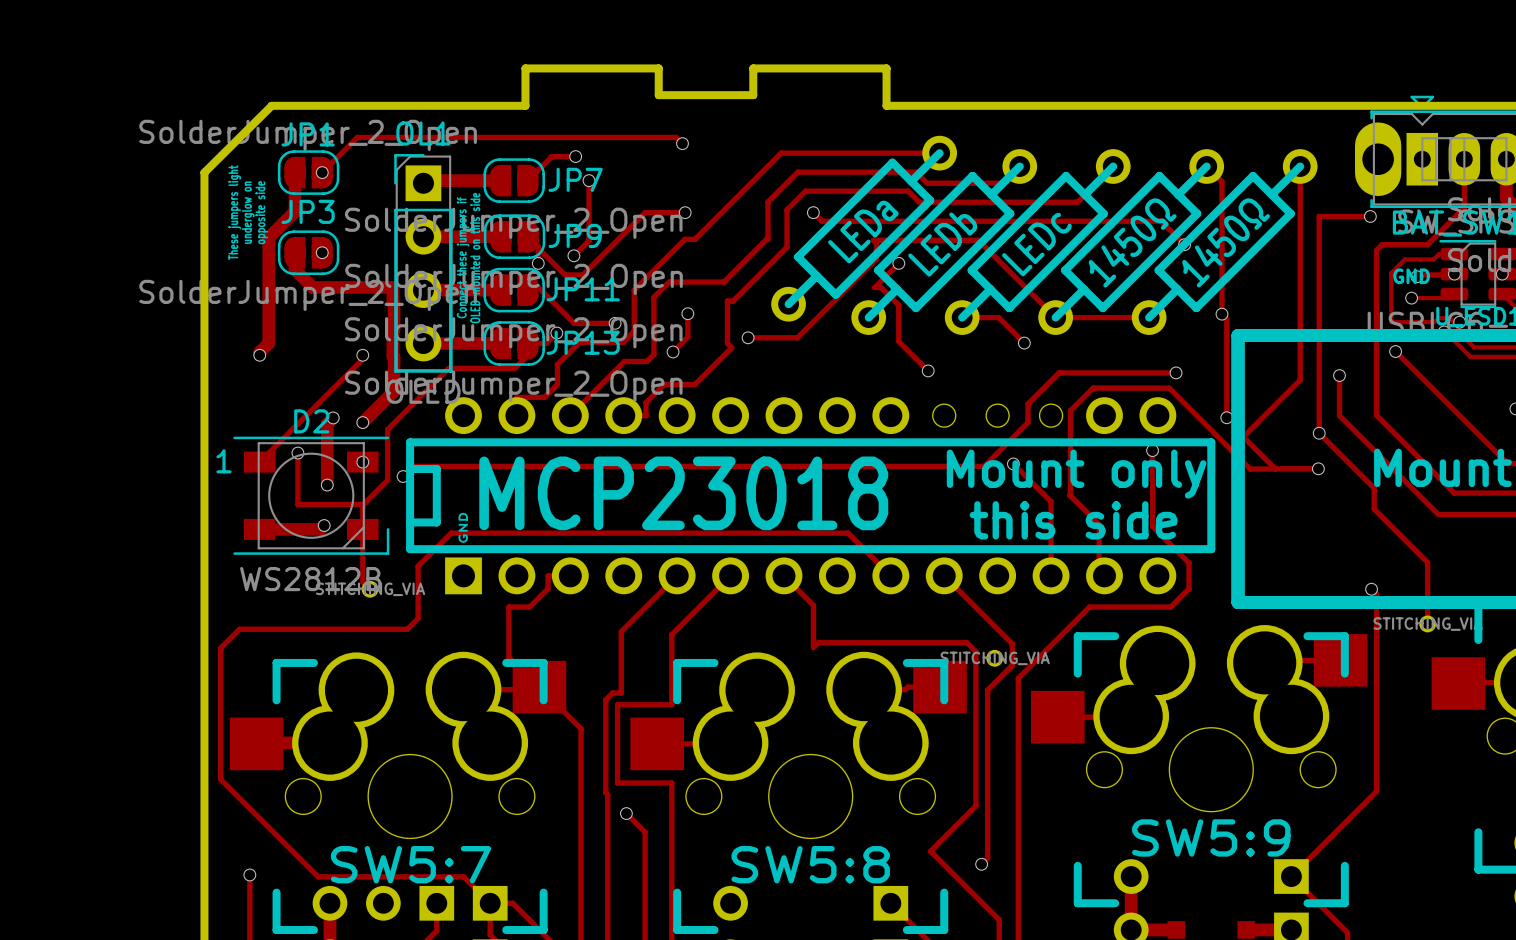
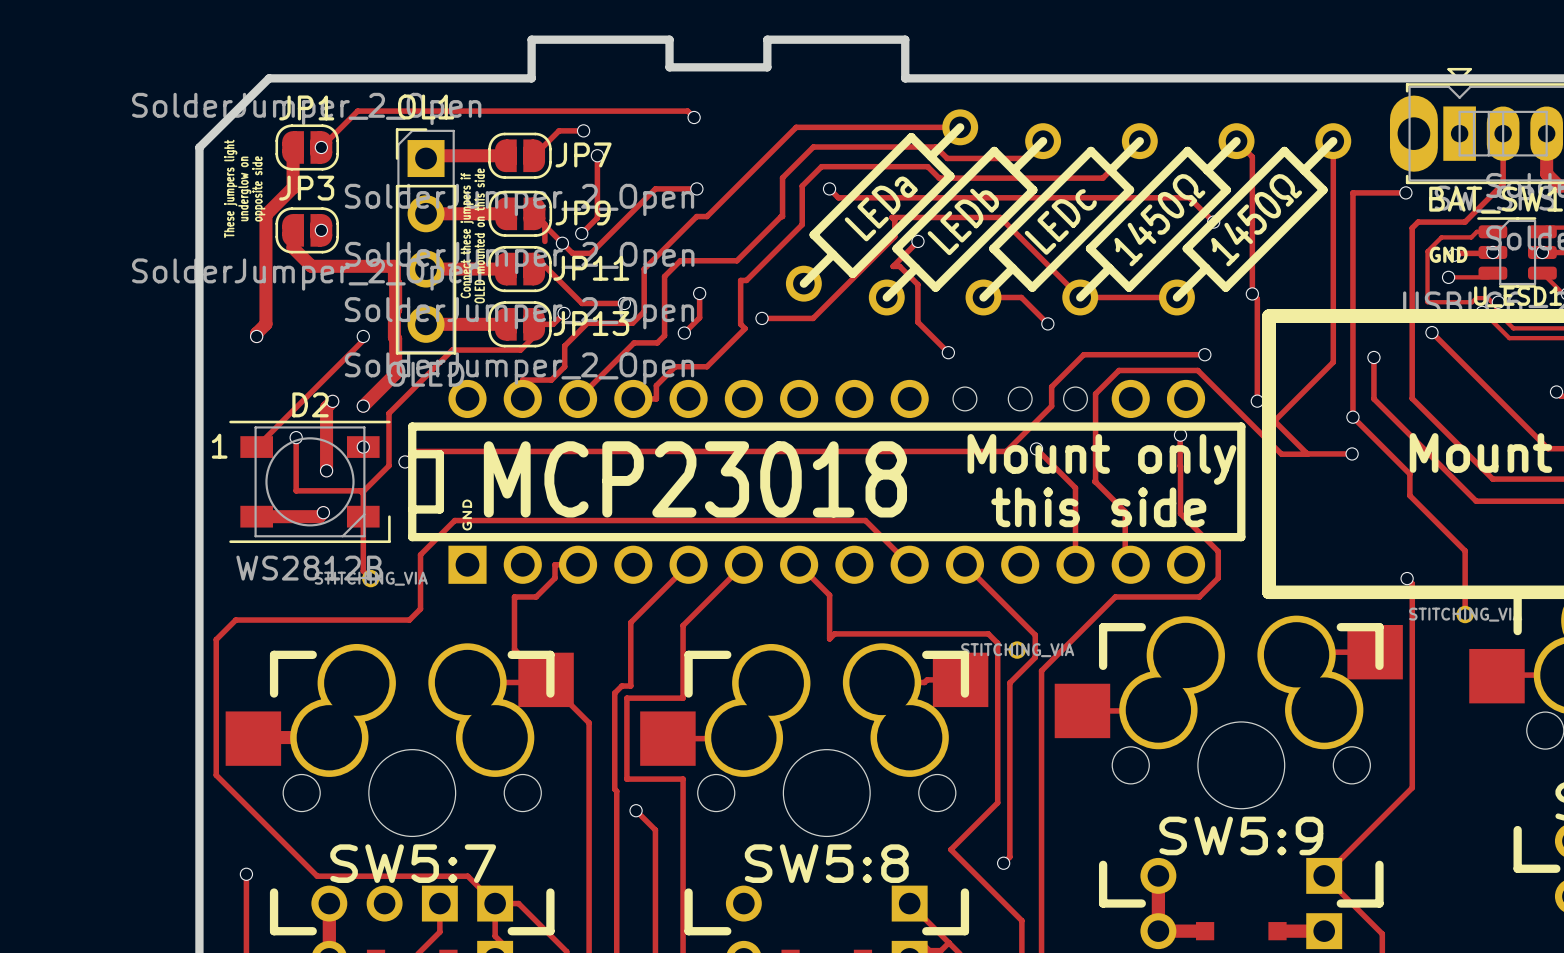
via position: (538, 263) -> (562, 243)

